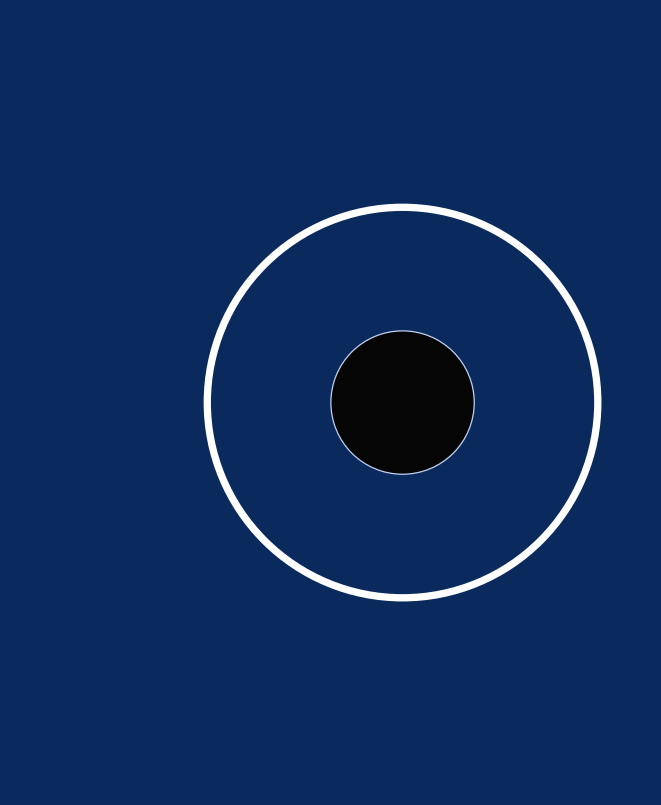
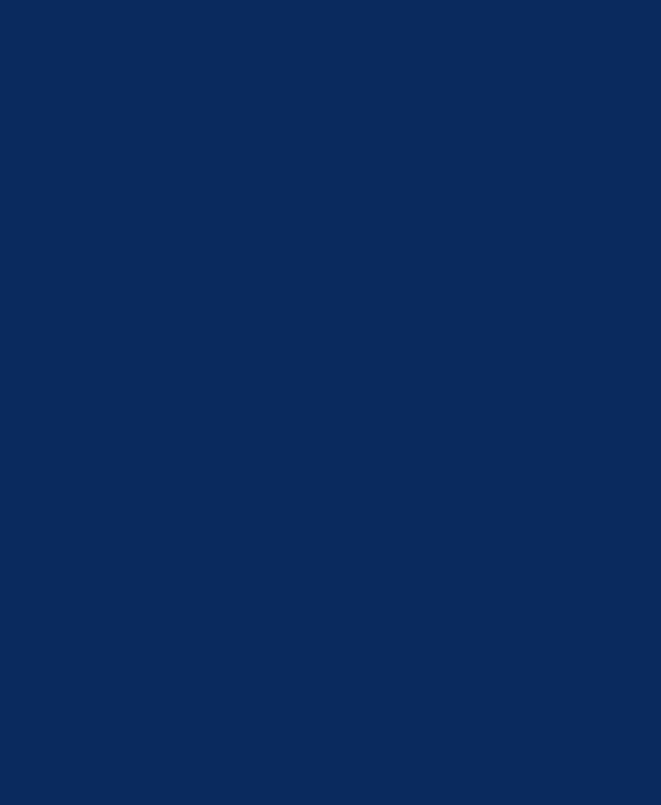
part: (402, 402) -> none

